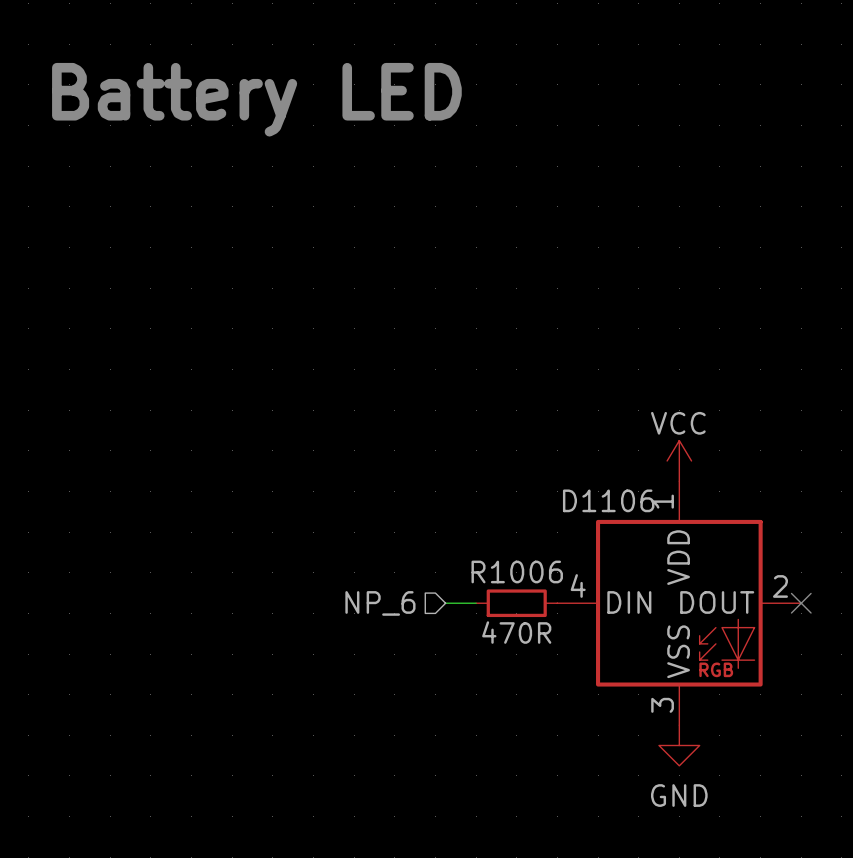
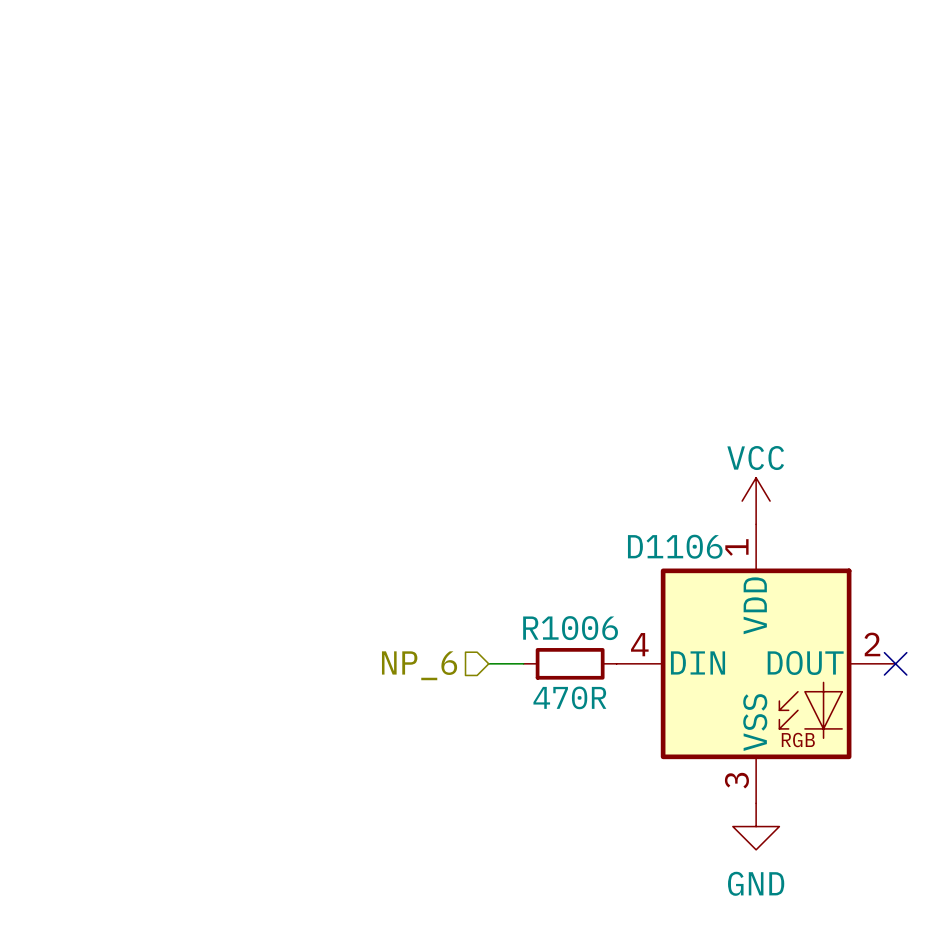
text: Battery LED (256, 99) -> none

